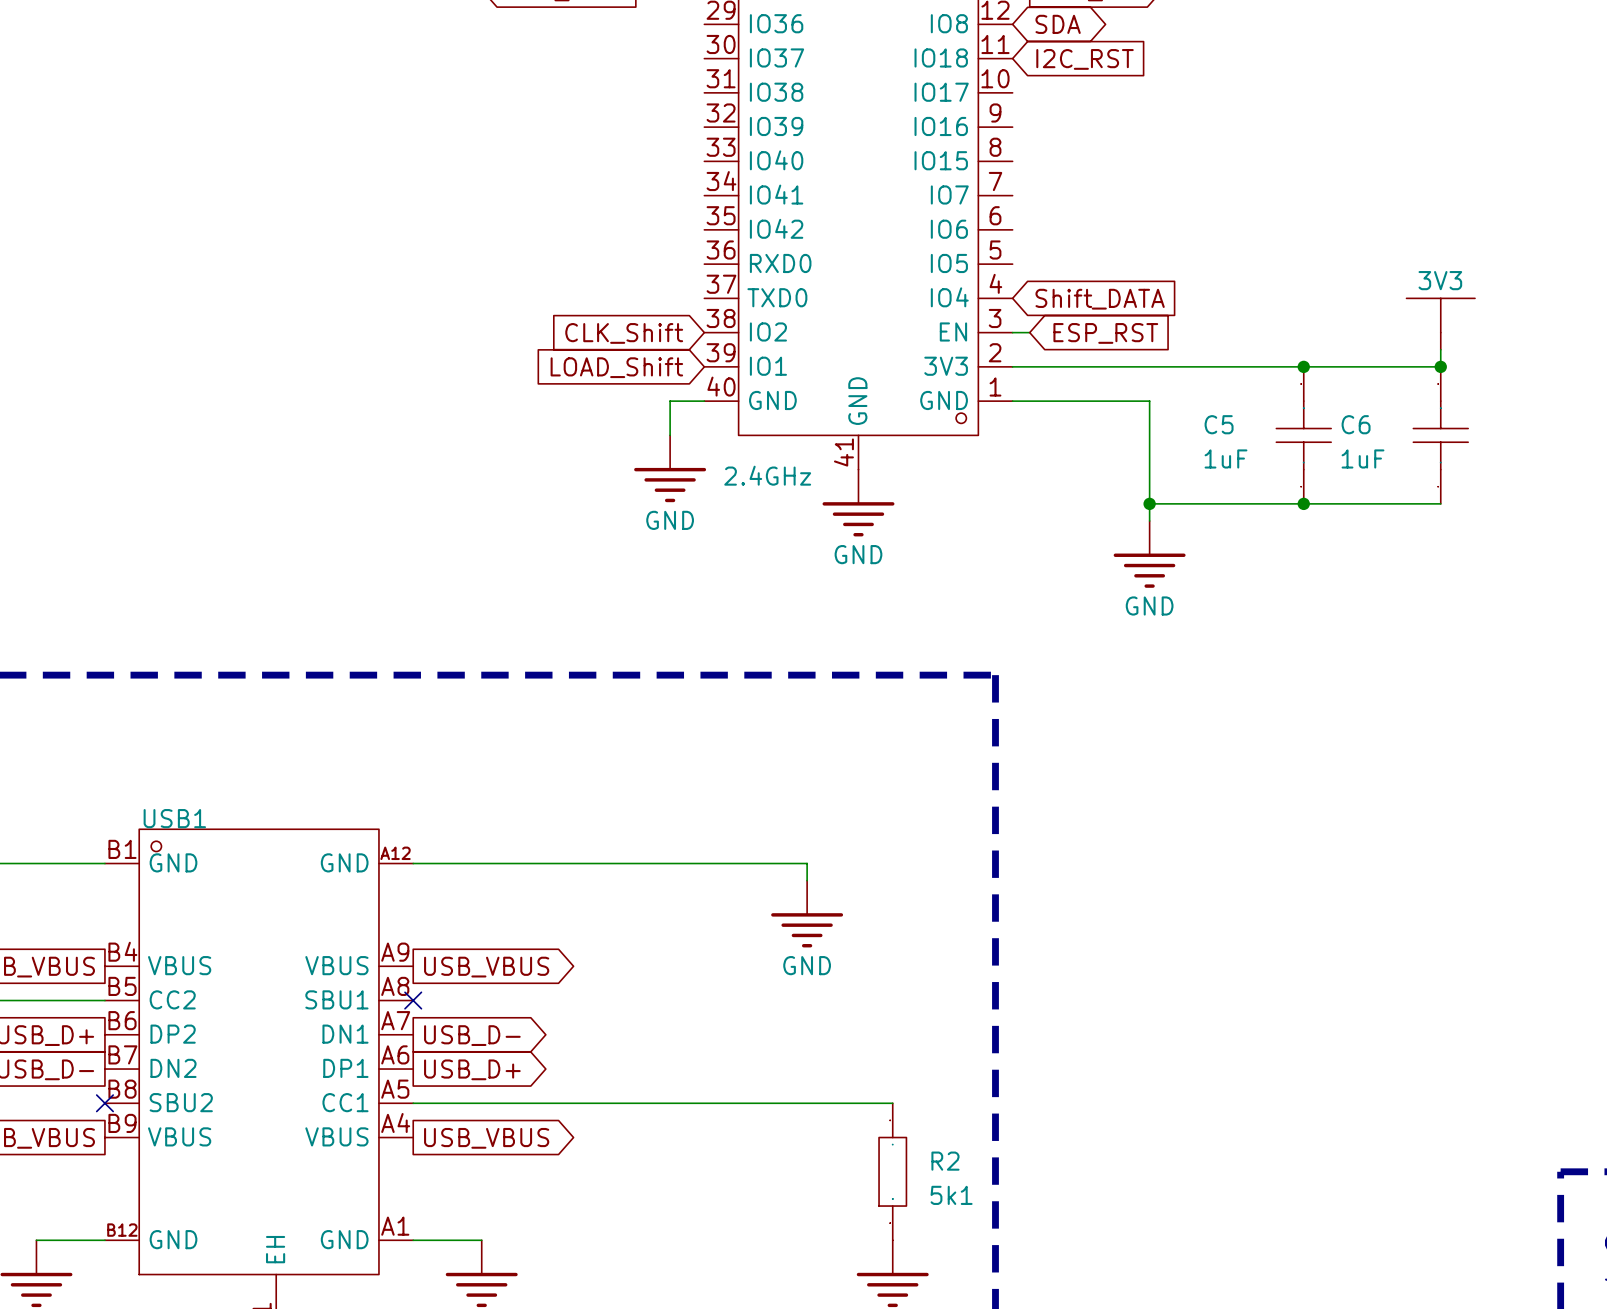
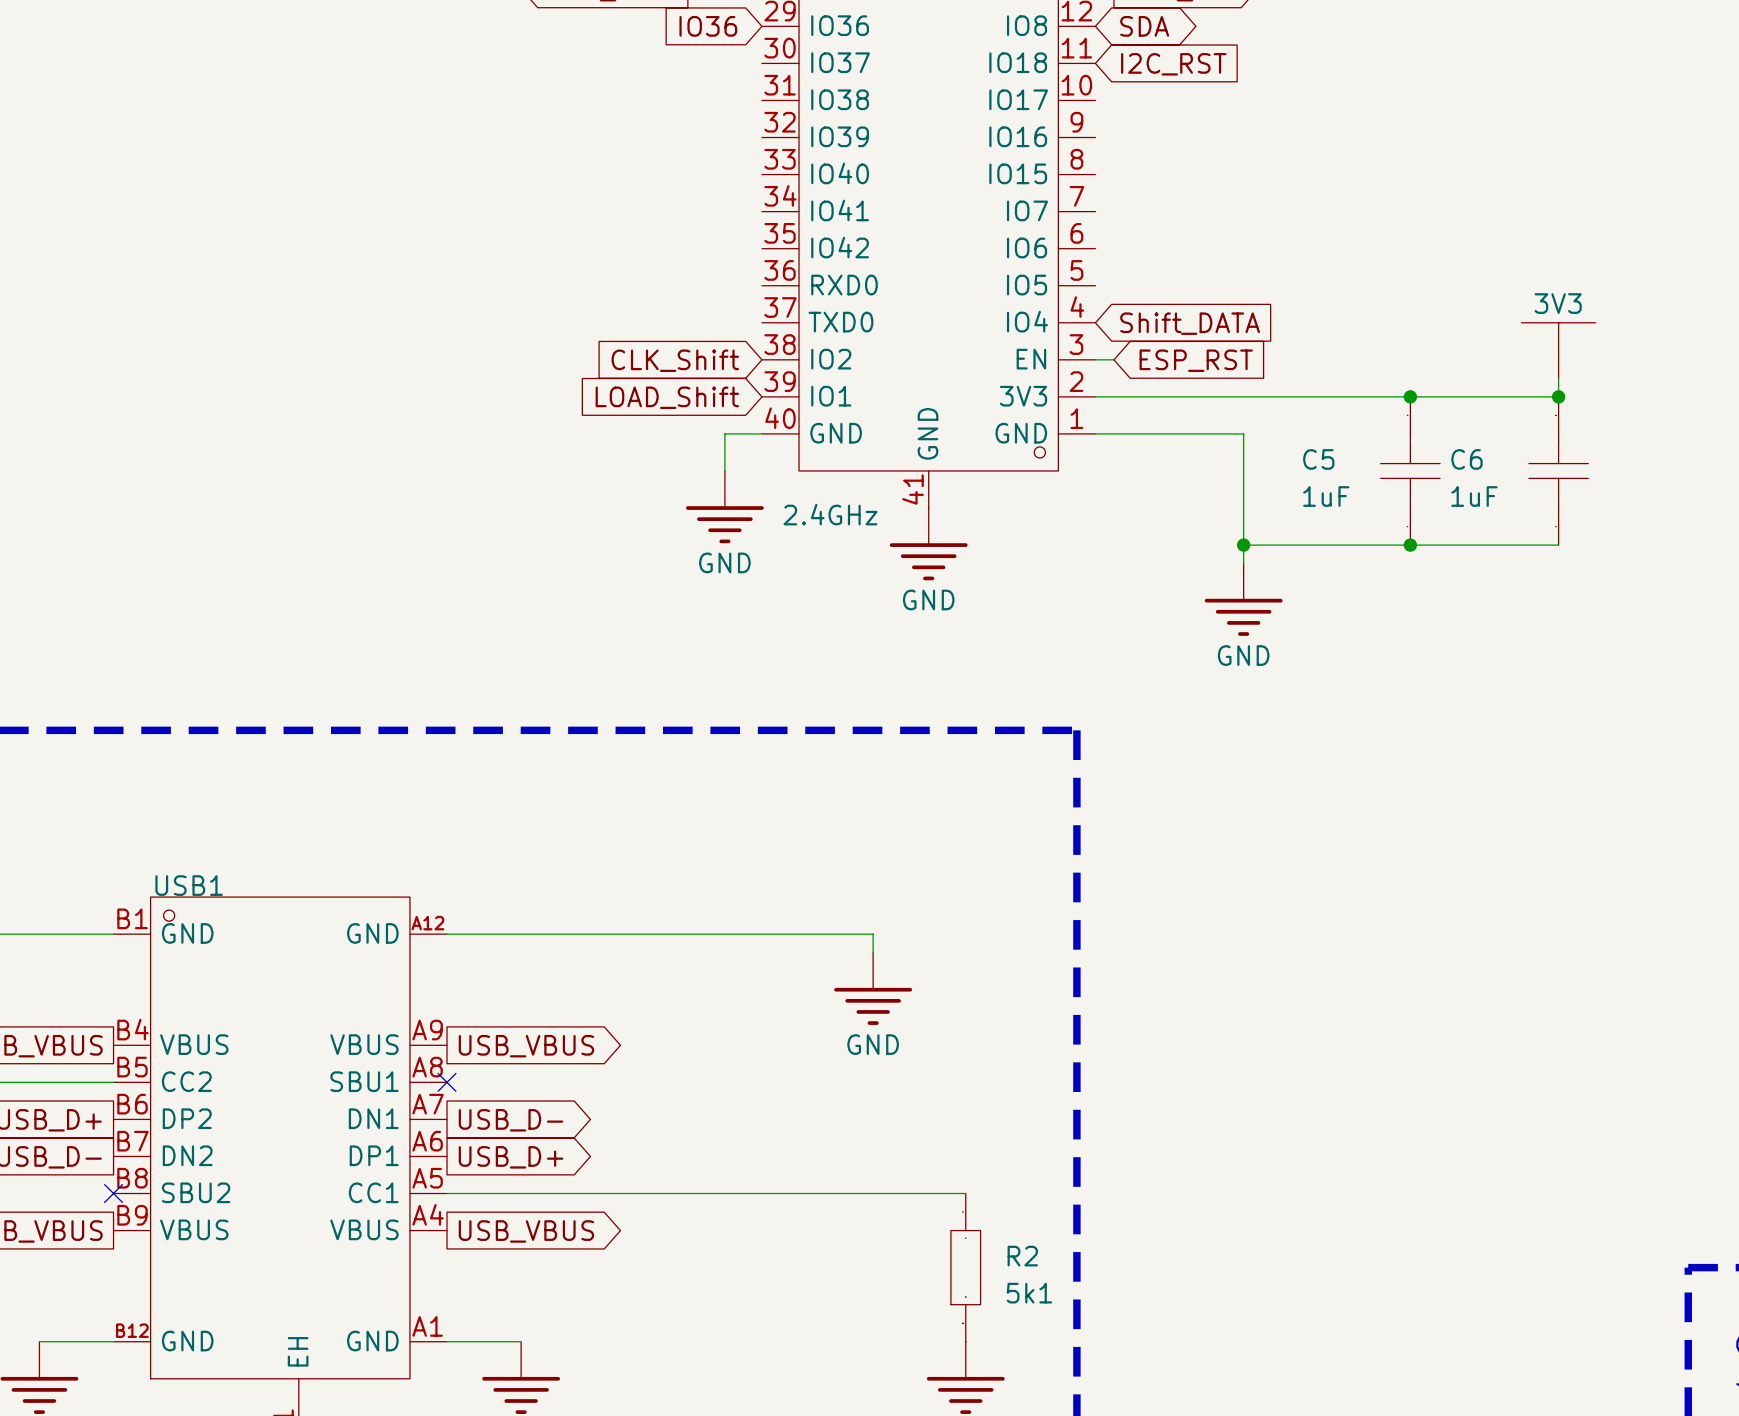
global label: none -> IO36 (708, 26)

